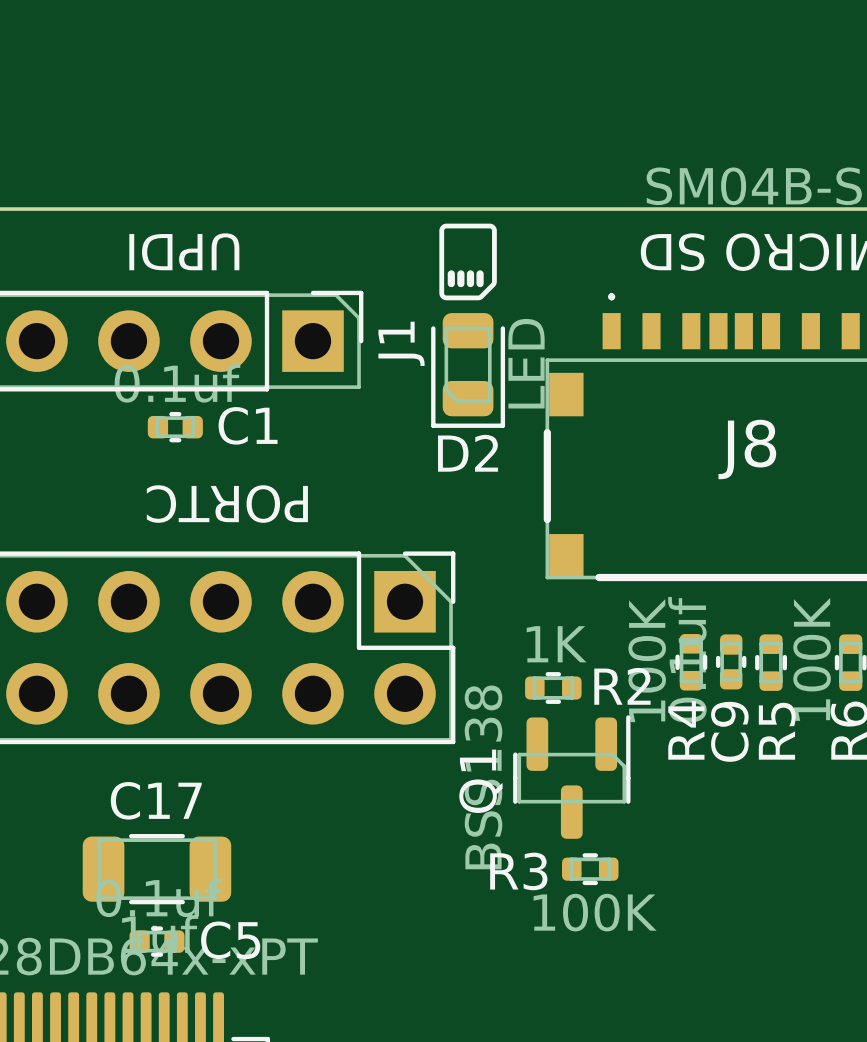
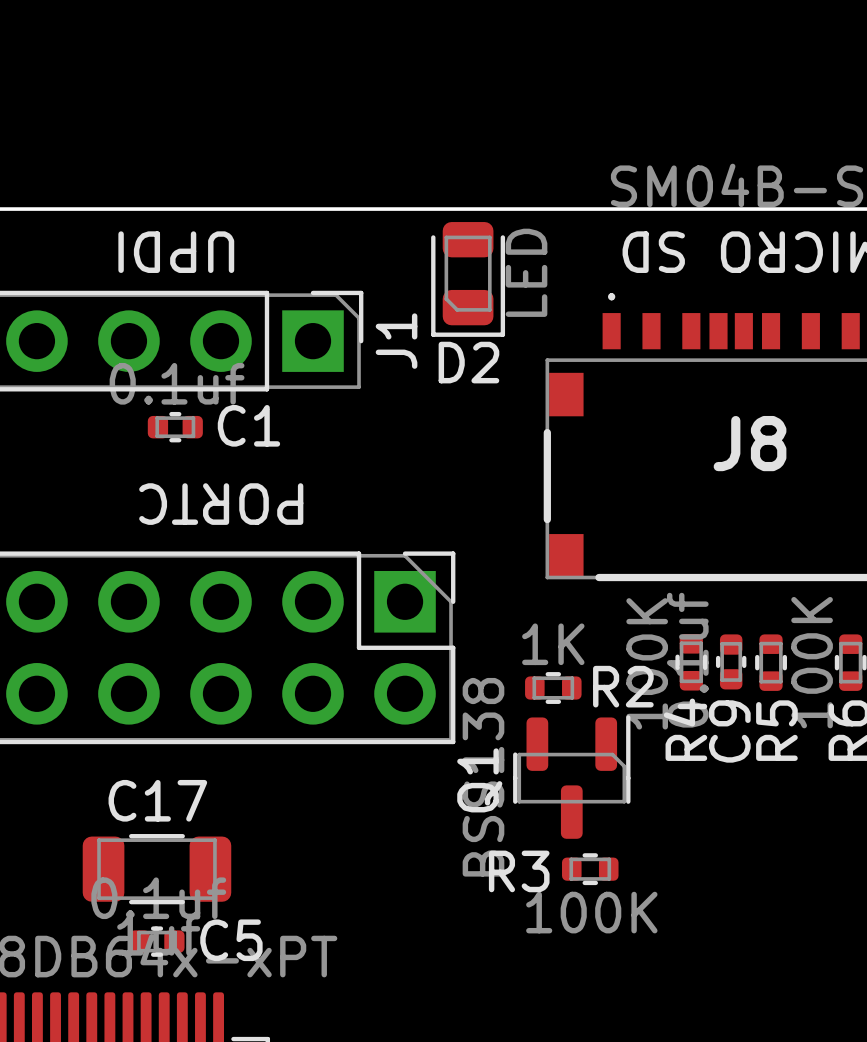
drawing: [439, 223, 497, 301] -> none
D2 position: (468, 370) -> (468, 279)

